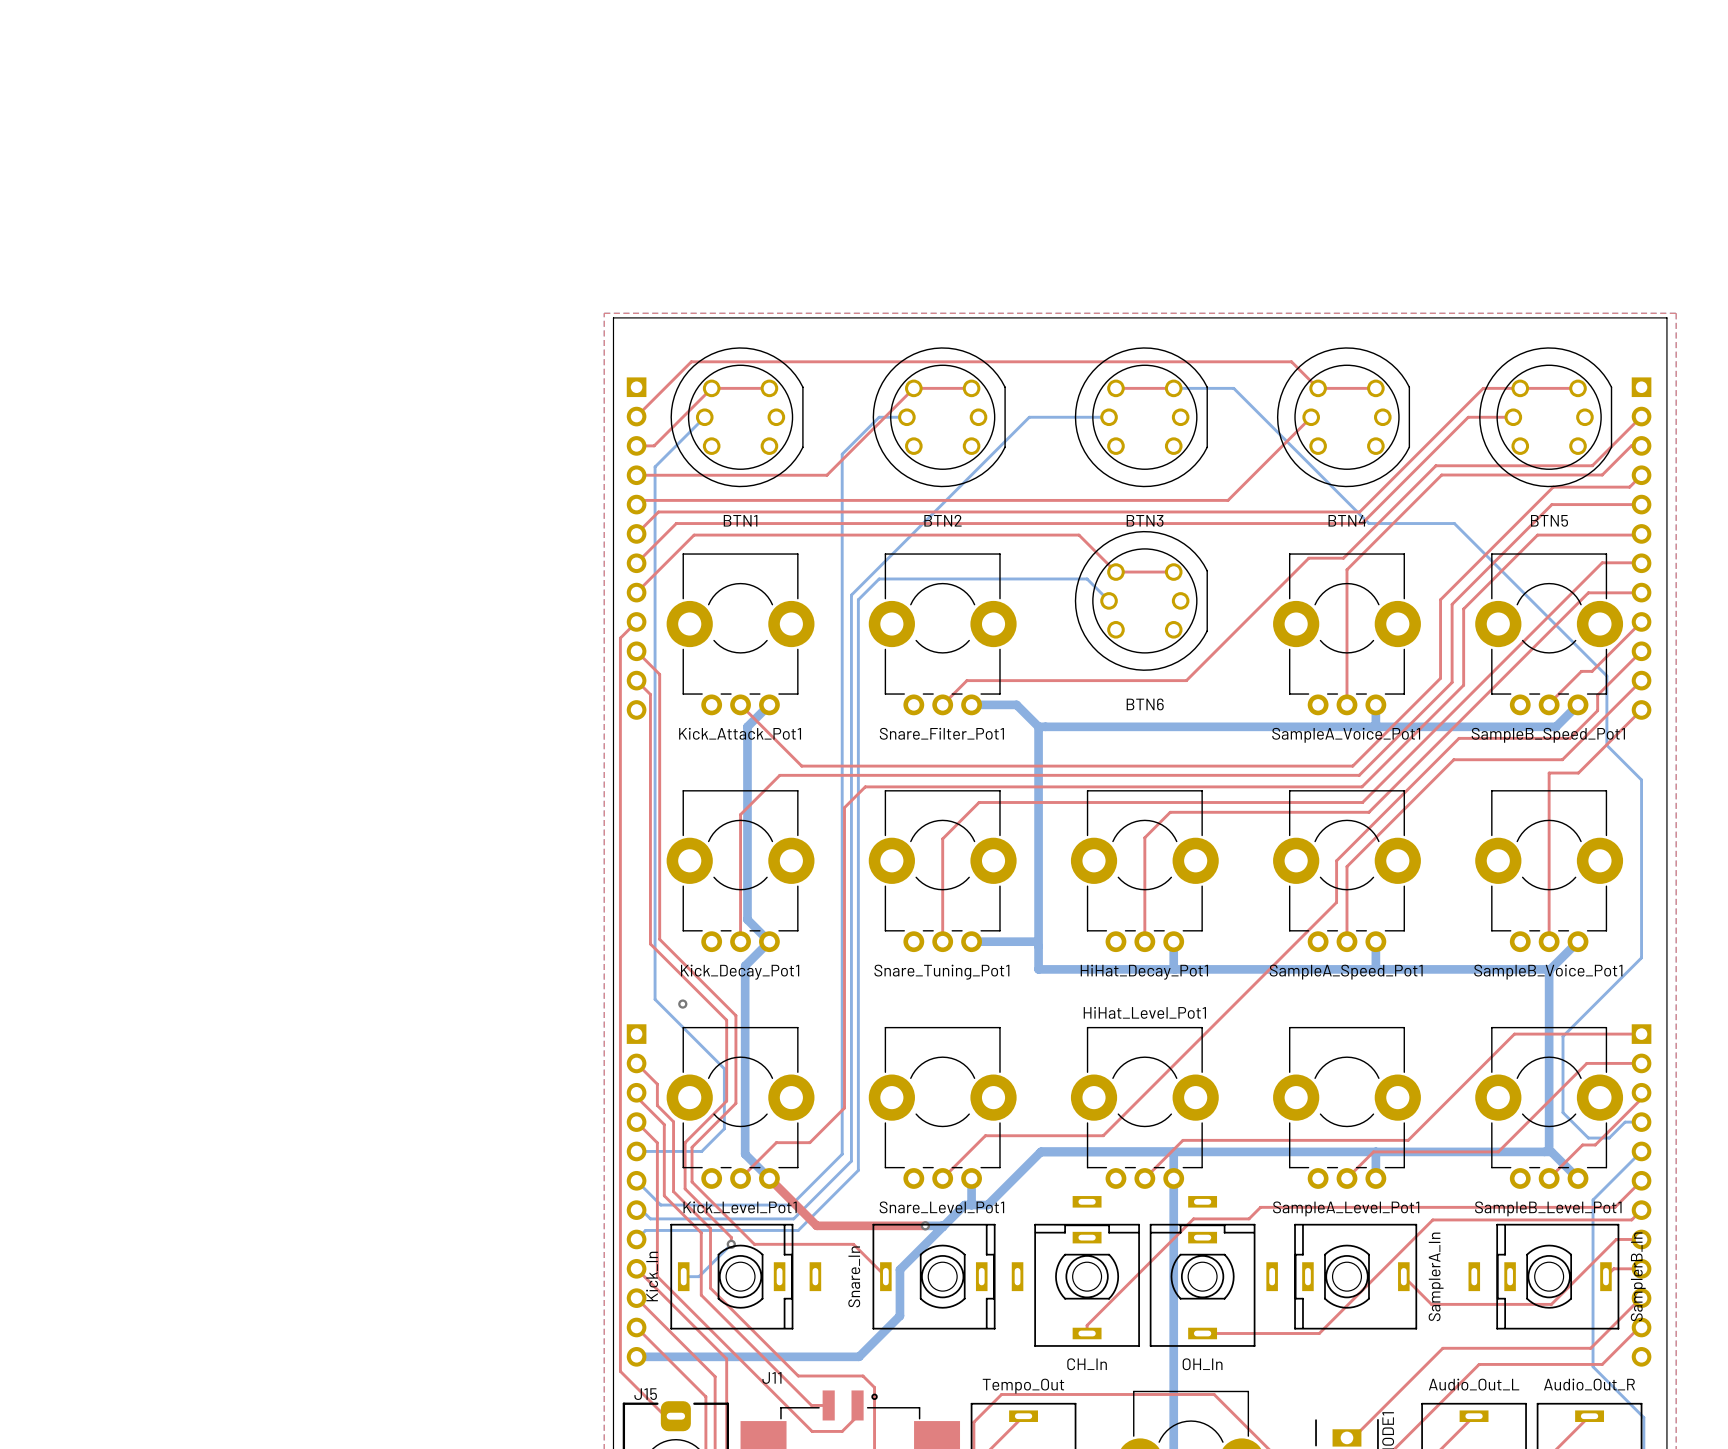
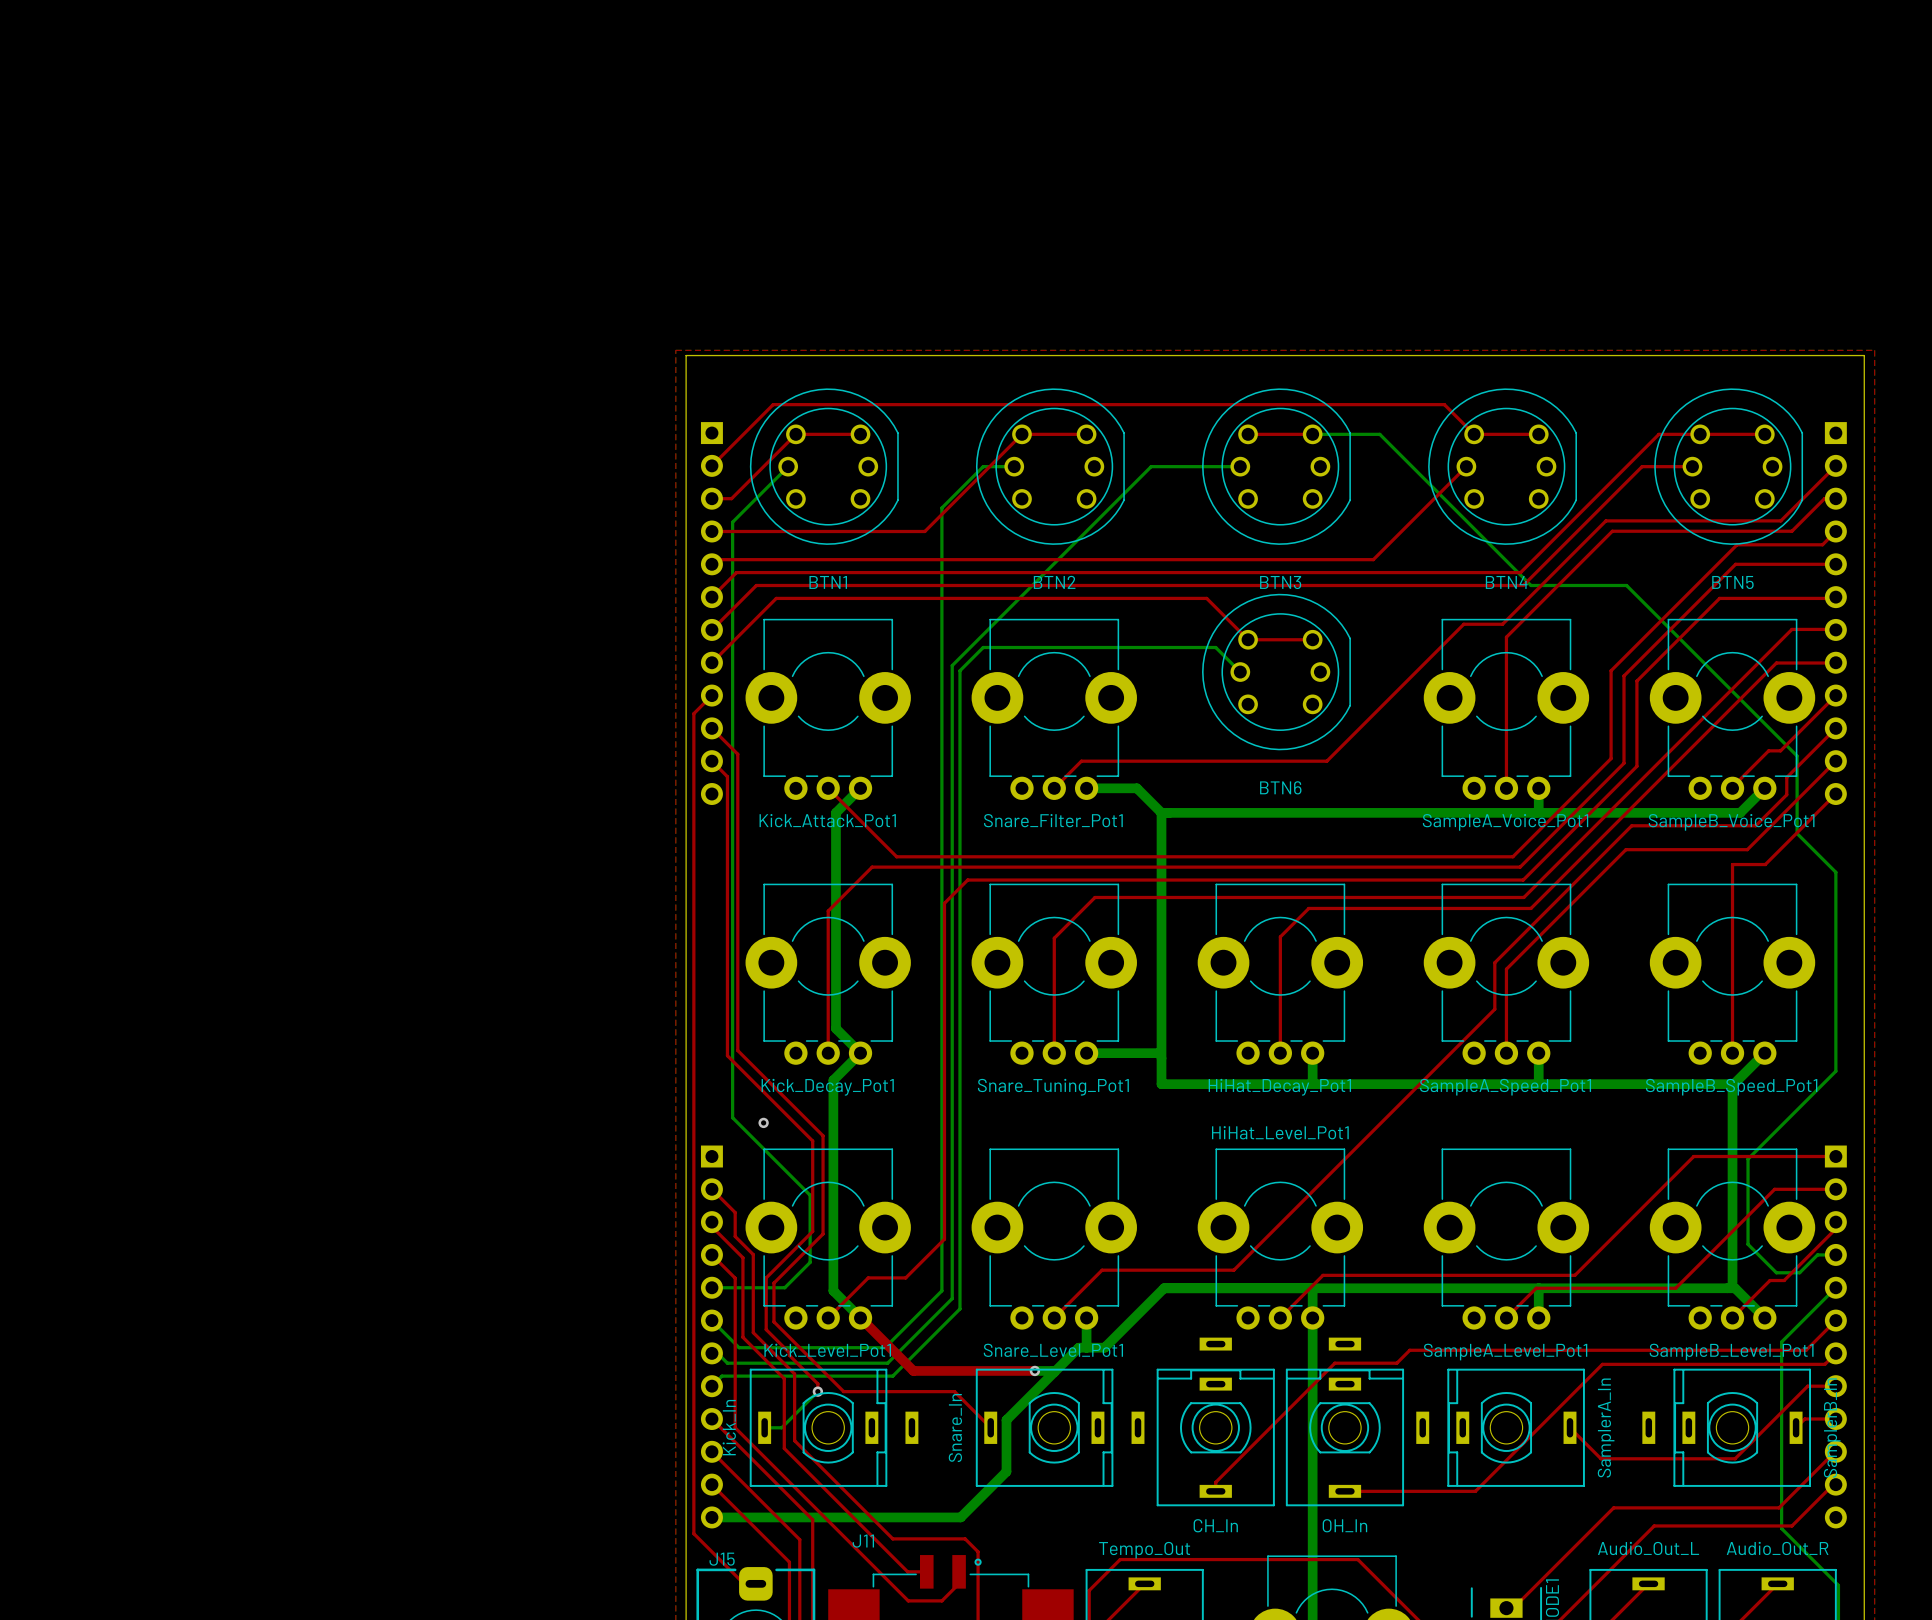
SampleB_Speed_Pot1 name: SampleB_Speed_Pot1 (1548, 735) -> SampleB_Voice_Pot1 (1731, 822)
SampleB_Voice_Pot1 name: SampleB_Voice_Pot1 (1548, 972) -> SampleB_Speed_Pot1 (1731, 1087)

